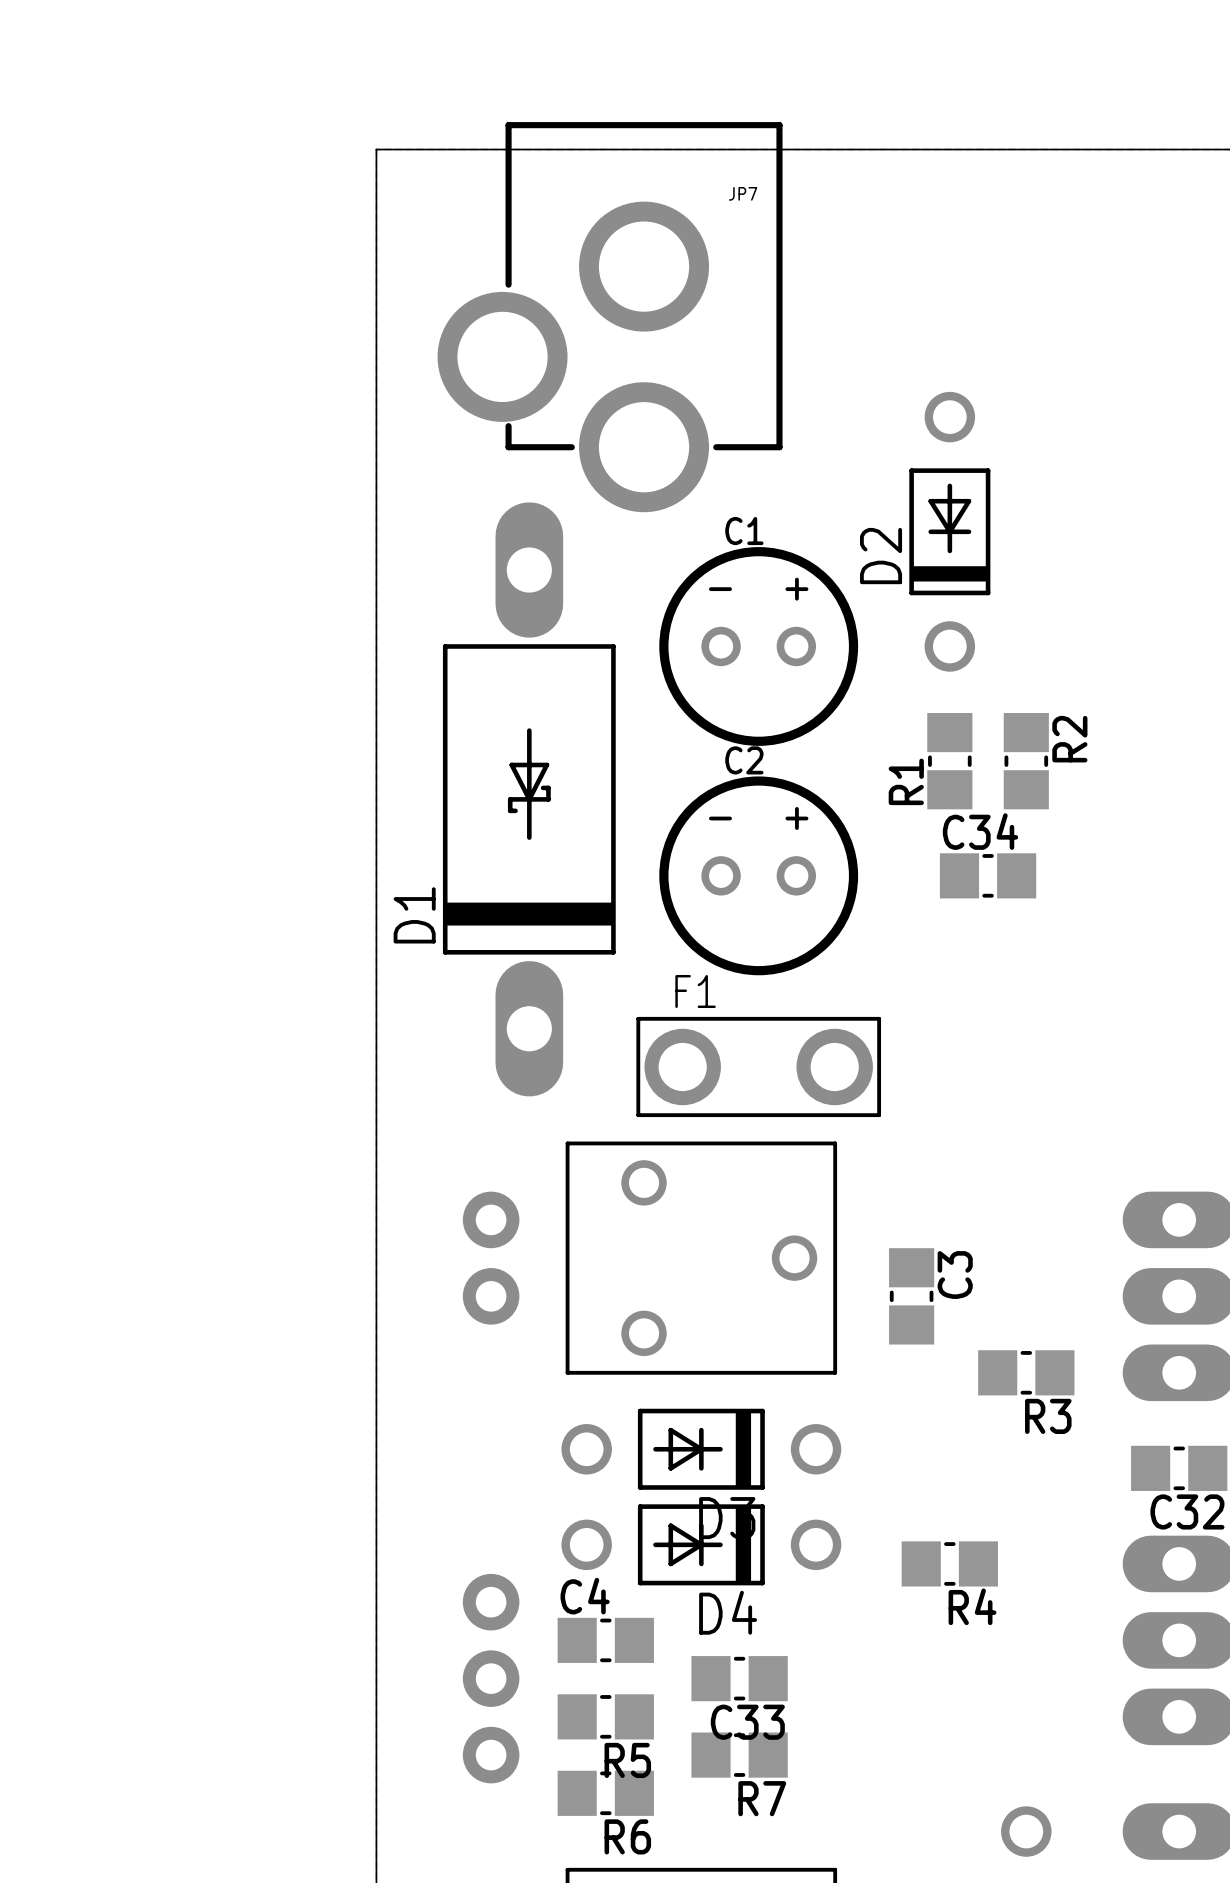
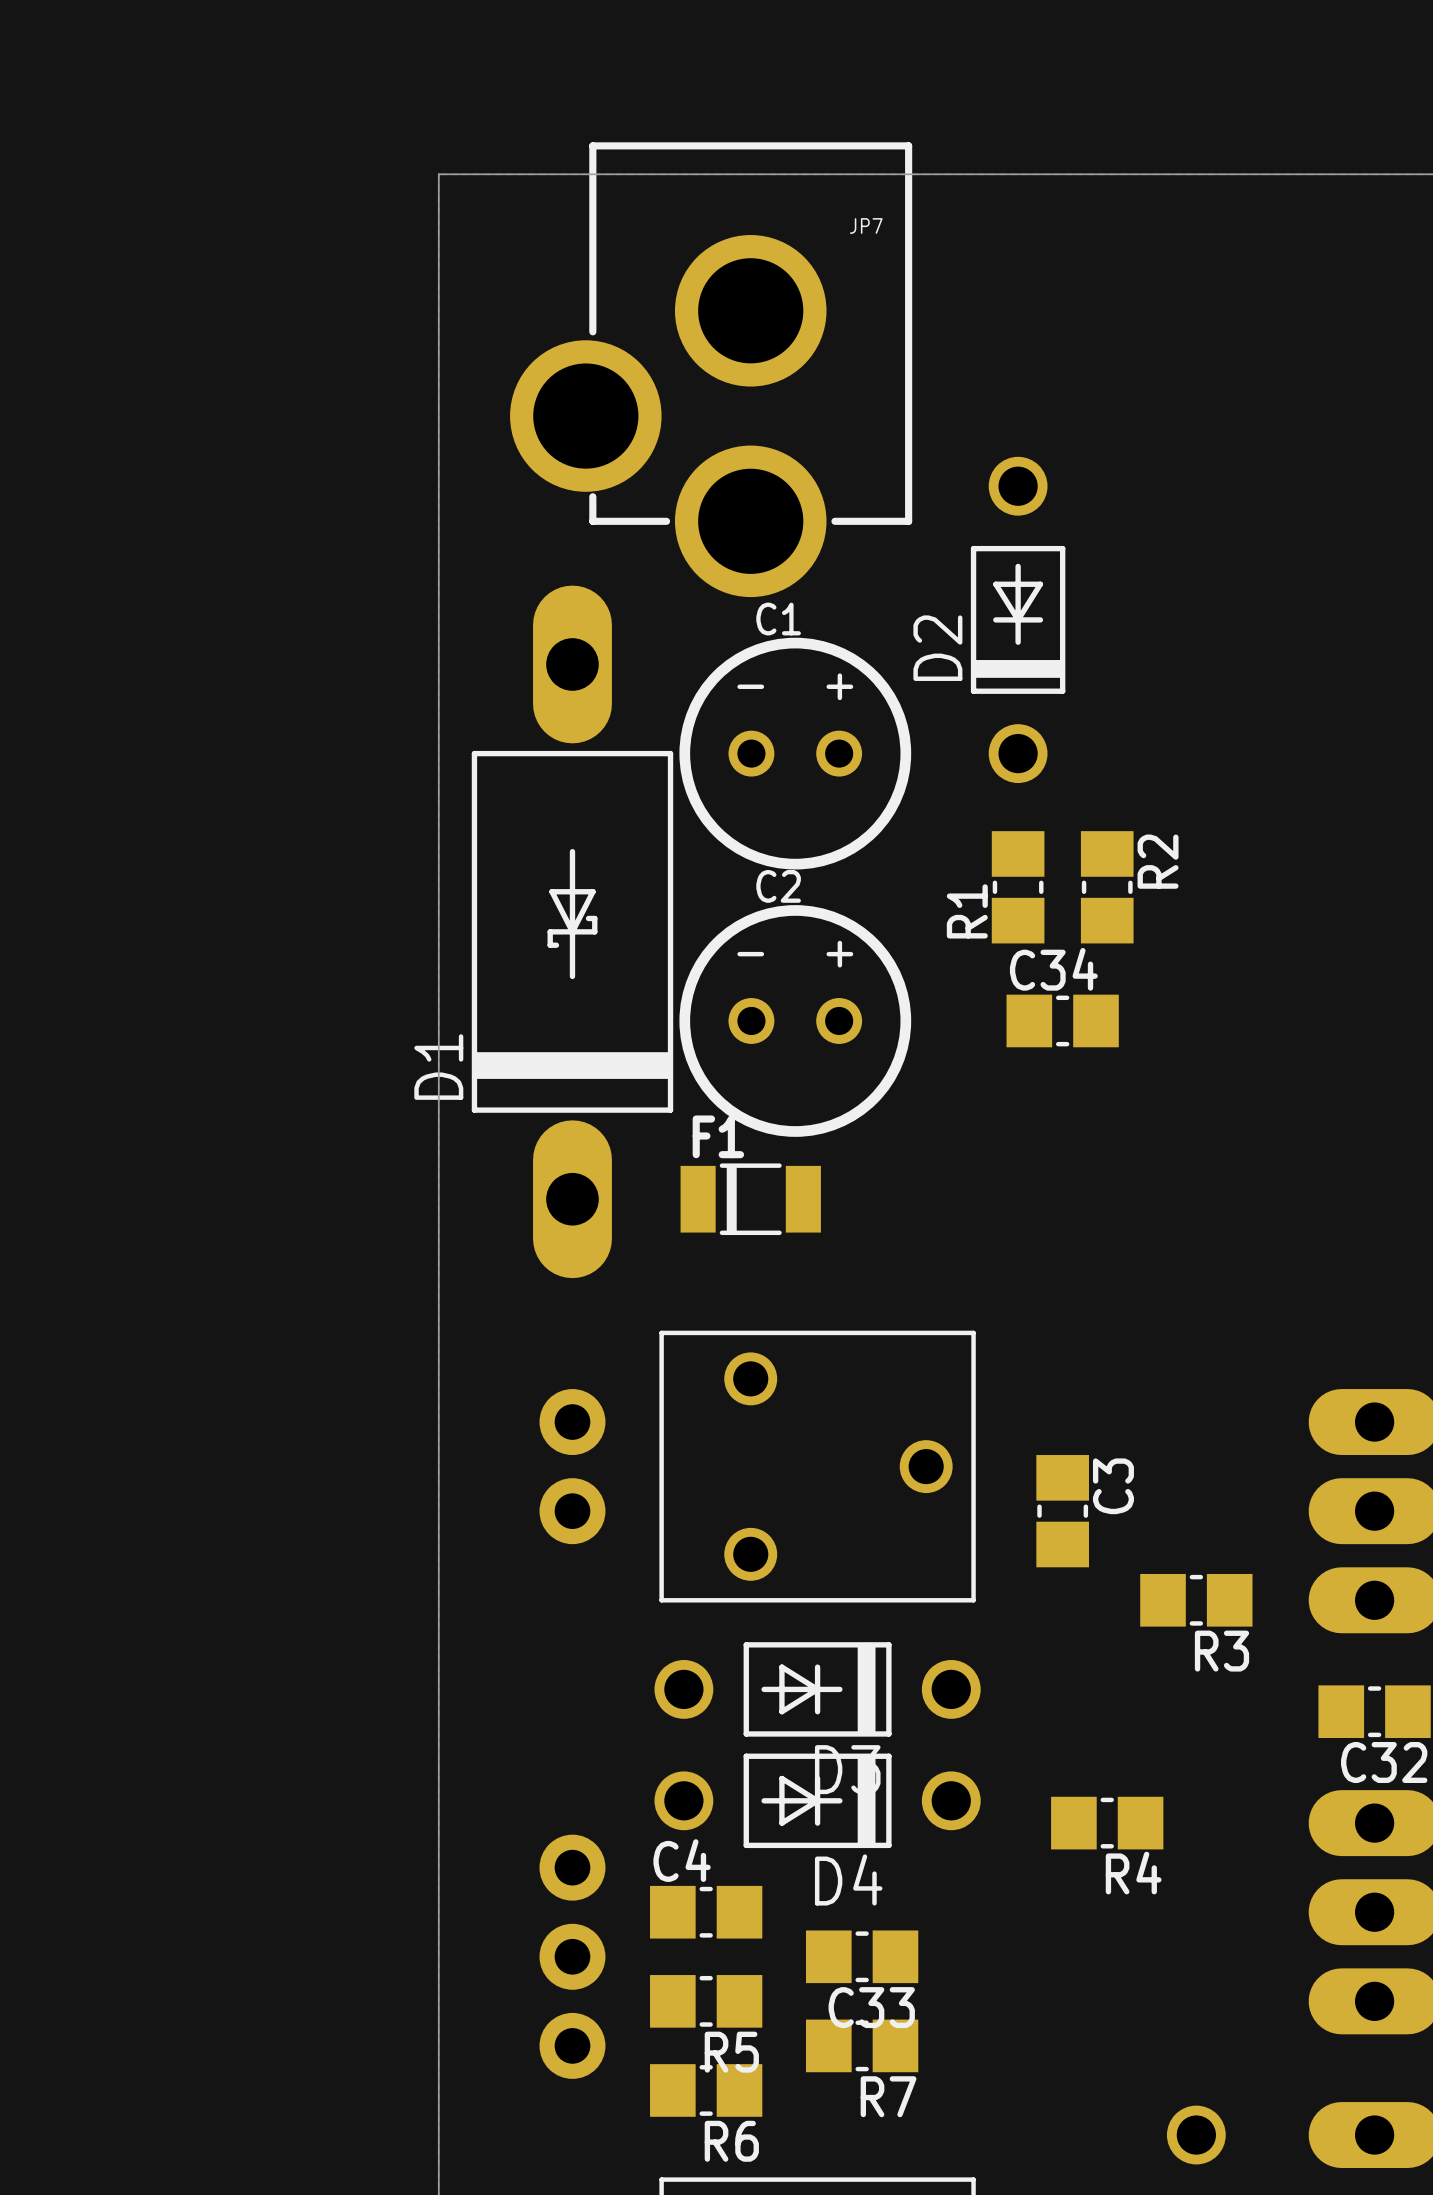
D2 position: (949, 531) -> (1018, 619)
C1 position: (758, 646) -> (795, 753)
R1: none -> (1018, 887)
R2: (1026, 761) -> none
R1 name: R1 (906, 781) -> R2 (1158, 861)
D1 position: (529, 799) -> (572, 931)
C2 position: (758, 875) -> (795, 1020)
C34 position: (988, 875) -> (1062, 1020)
F1 footprint: [636, 1016, 882, 1118] -> [680, 1163, 821, 1236]

